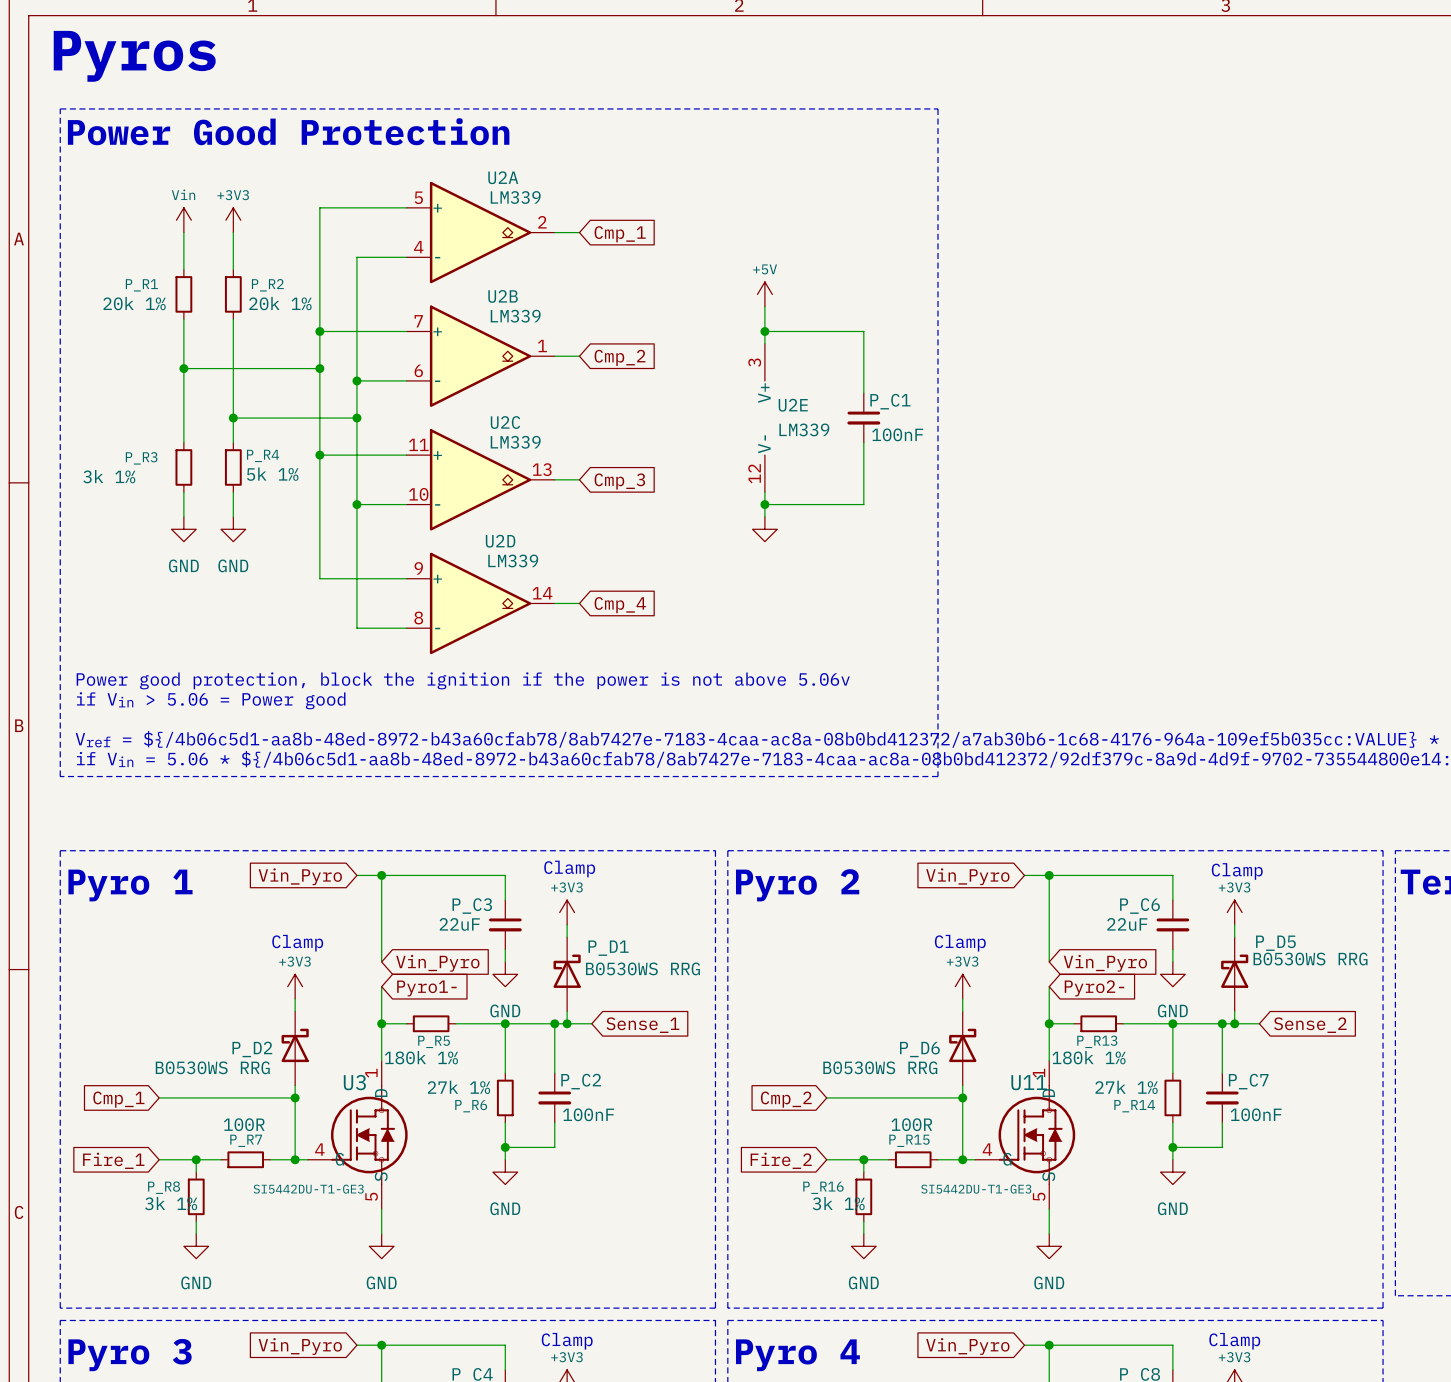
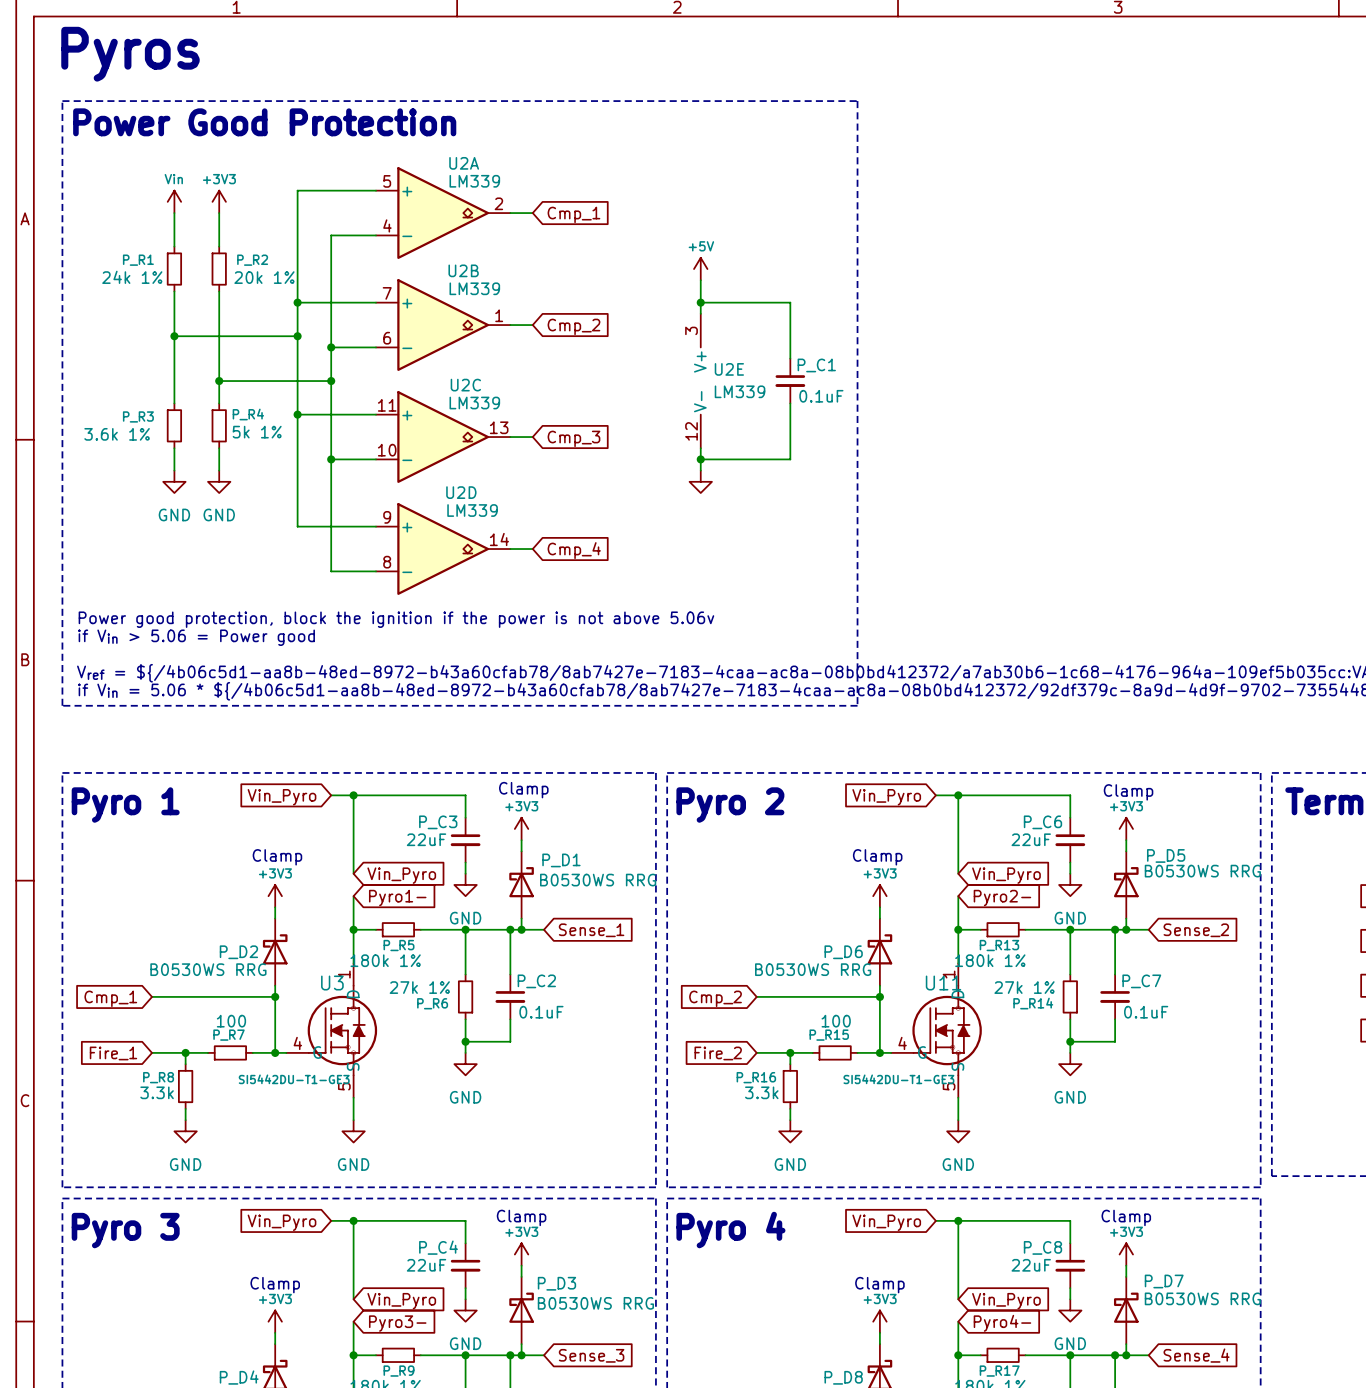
P_R1 value: 20k 1% (134, 303) -> 24k 1% (132, 277)
P_C1 value: 100nF (897, 434) -> 0.1uF (821, 396)
P_R3 value: 3k 1% (109, 476) -> 3.6k 1% (117, 434)
P_C2 value: 100nF (588, 1114) -> 0.1uF (541, 1012)
P_C7 value: 100nF (1256, 1114) -> 0.1uF (1146, 1012)
P_R7 value: 100R (244, 1124) -> 100 (231, 1021)
P_R15 value: 100R (911, 1124) -> 100 (836, 1021)
P_R8 value: 3k 1% (171, 1203) -> 3.3k (157, 1092)
P_R16 value: 3k 1% (838, 1203) -> 3.3k (761, 1092)

